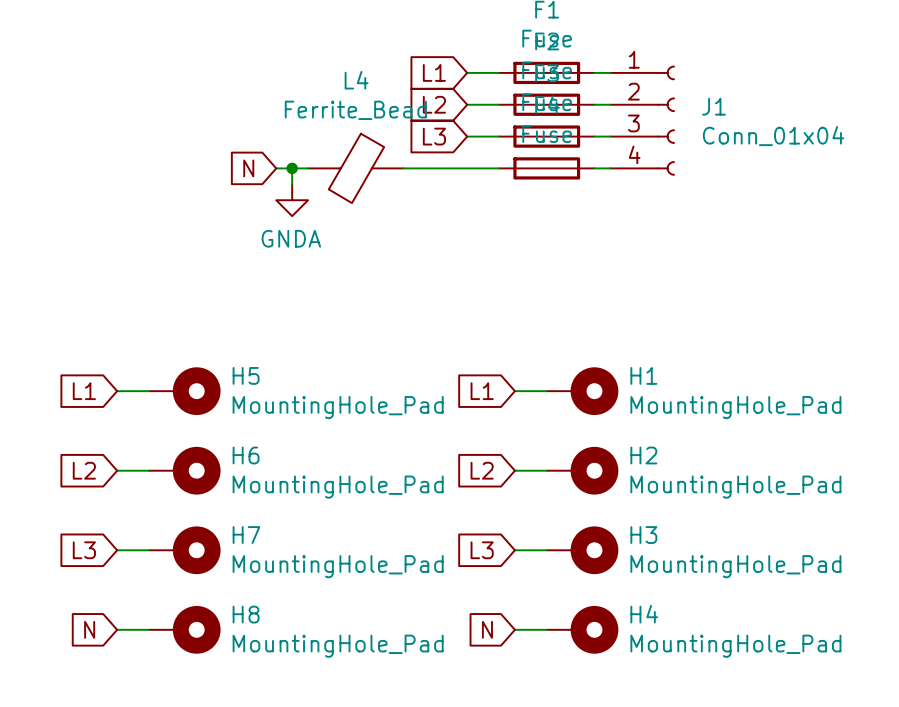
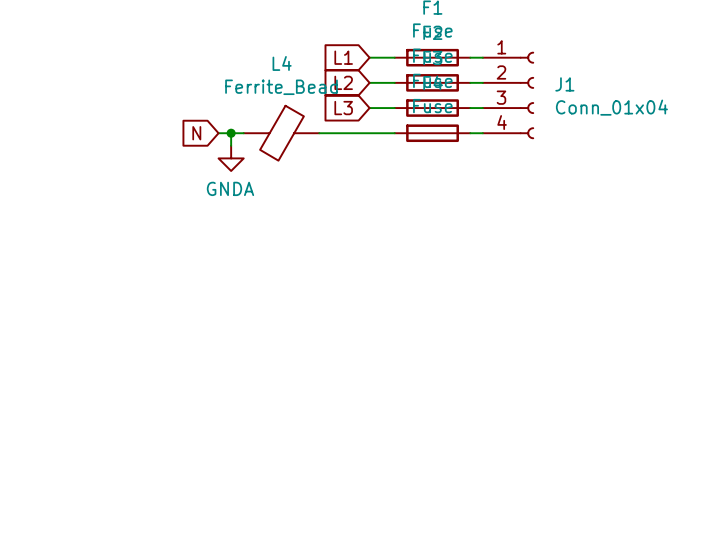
global label: L1 (84, 391) -> none
wire: (117, 391) (148, 391) -> none
H5: MountingHole_Pad (184, 391) -> none
global label: L1 (482, 391) -> none
wire: (514, 391) (546, 391) -> none
H1: MountingHole_Pad (582, 391) -> none
global label: L2 (84, 470) -> none
wire: (117, 470) (148, 470) -> none
H6: MountingHole_Pad (184, 470) -> none
global label: L2 (482, 470) -> none
wire: (514, 470) (546, 470) -> none
H2: MountingHole_Pad (582, 470) -> none
global label: L3 (84, 550) -> none
wire: (117, 550) (148, 550) -> none
H7: MountingHole_Pad (184, 550) -> none
global label: L3 (482, 550) -> none
wire: (514, 550) (546, 550) -> none
H3: MountingHole_Pad (582, 550) -> none
global label: N (89, 629) -> none
wire: (117, 629) (148, 629) -> none
H8: MountingHole_Pad (184, 629) -> none
global label: N (487, 629) -> none
wire: (514, 629) (546, 629) -> none
H4: MountingHole_Pad (582, 629) -> none

